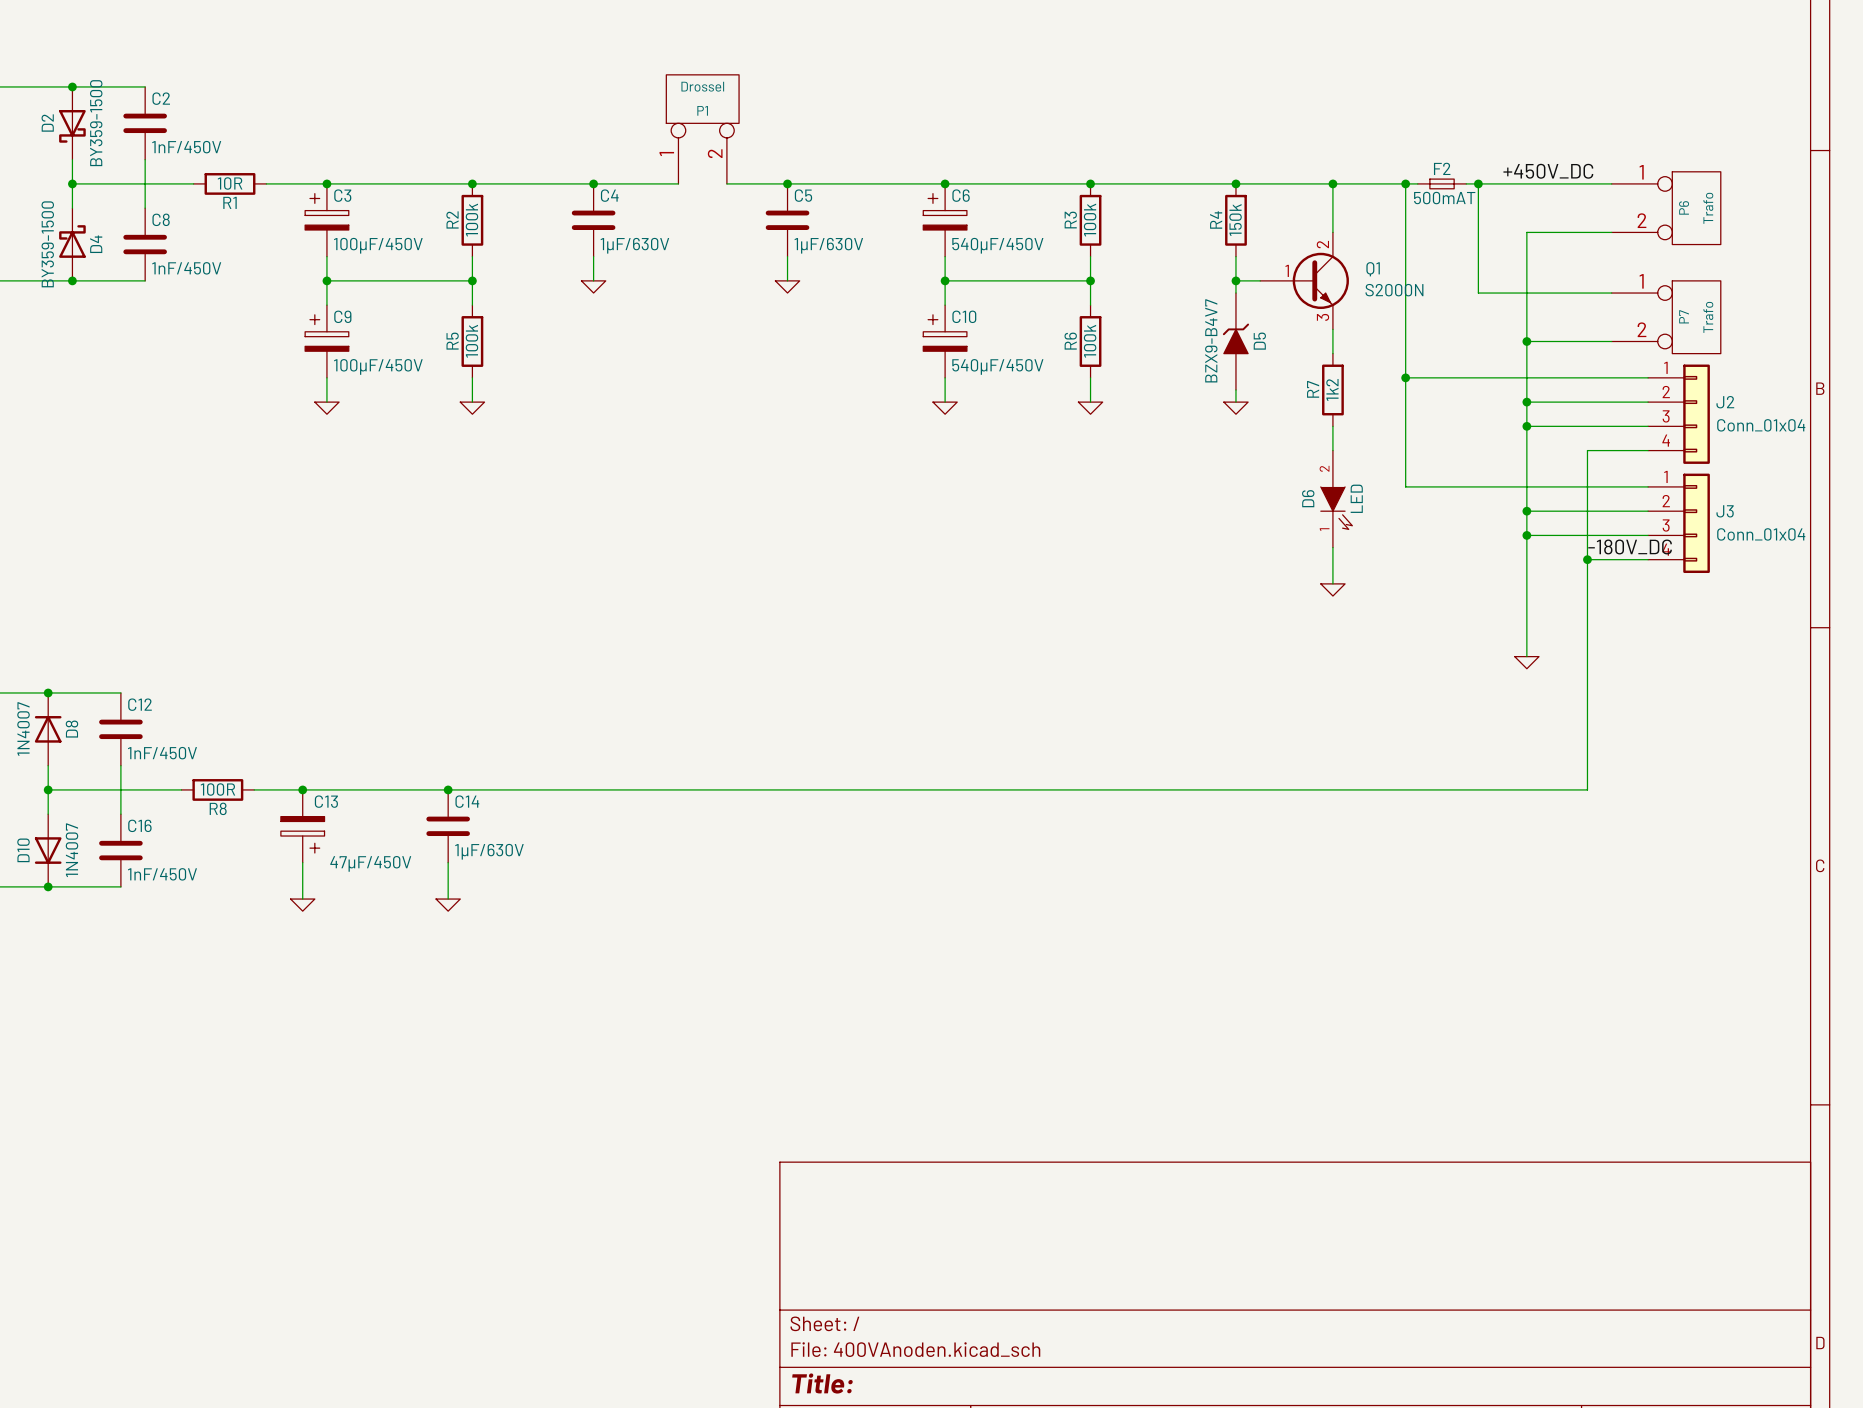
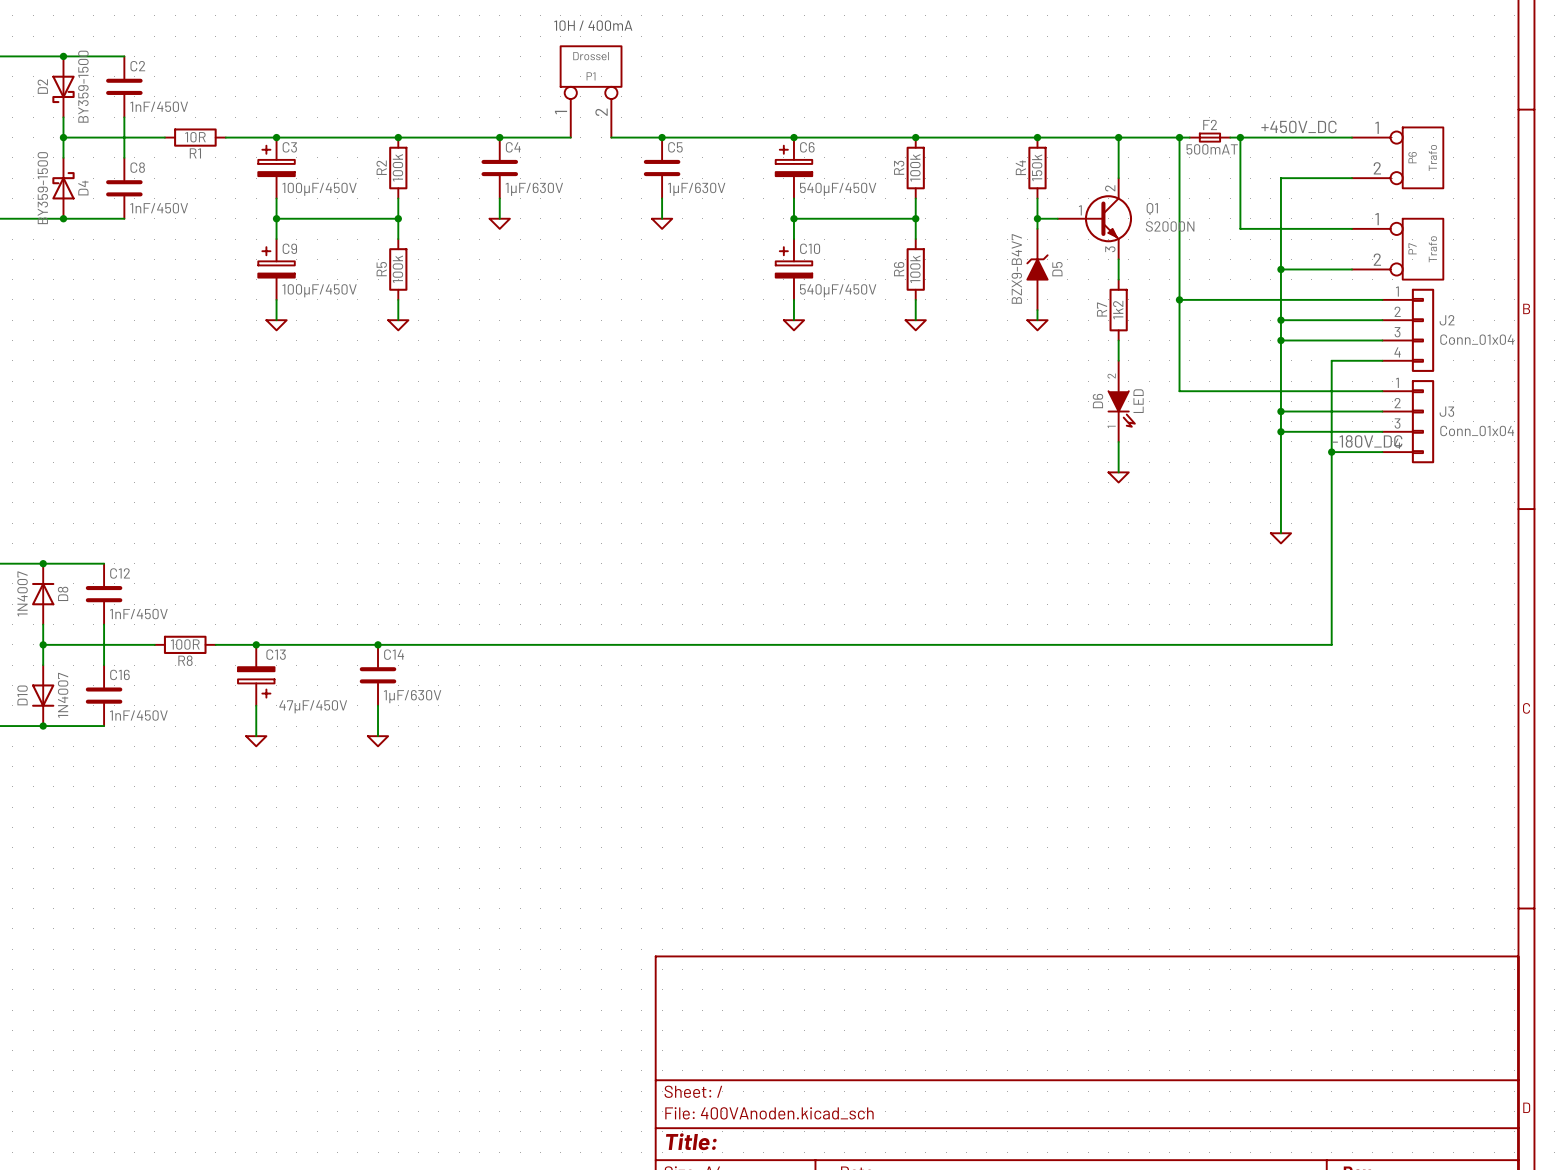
text: none -> 10H / 400mA (593, 25)

